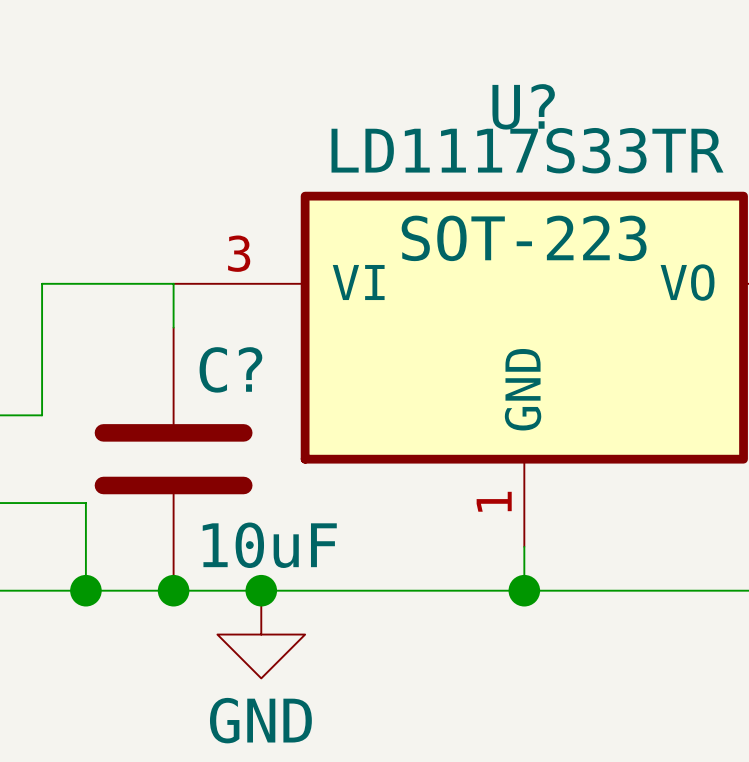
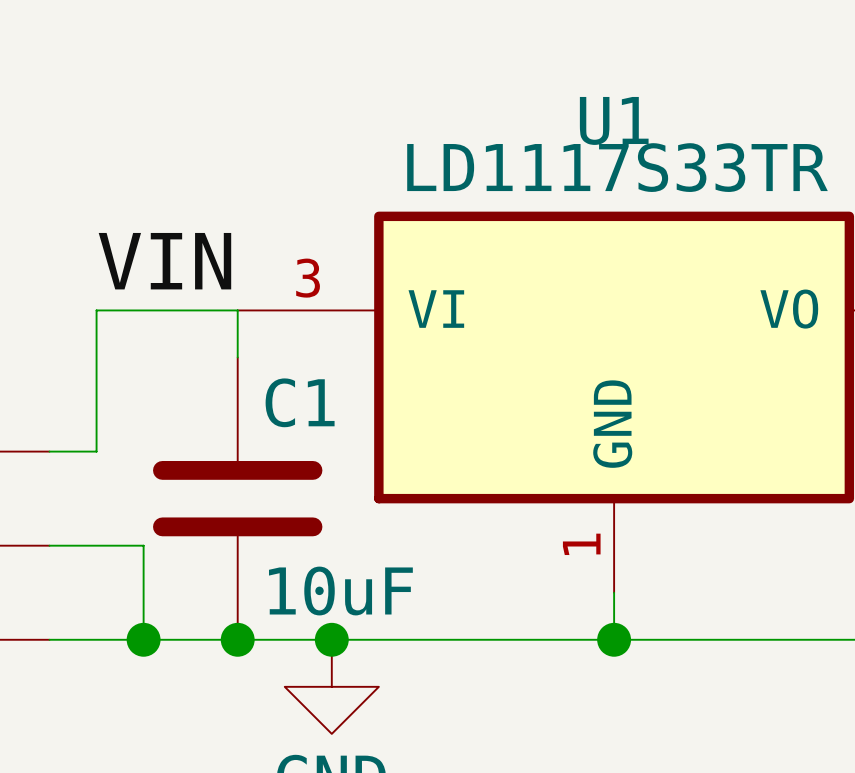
U? name: U? (523, 106) -> U1 (614, 120)
label: none -> VIN (164, 261)
U? text: SOT-223 (524, 238) -> none
C? name: C? (230, 369) -> C1 (300, 402)

